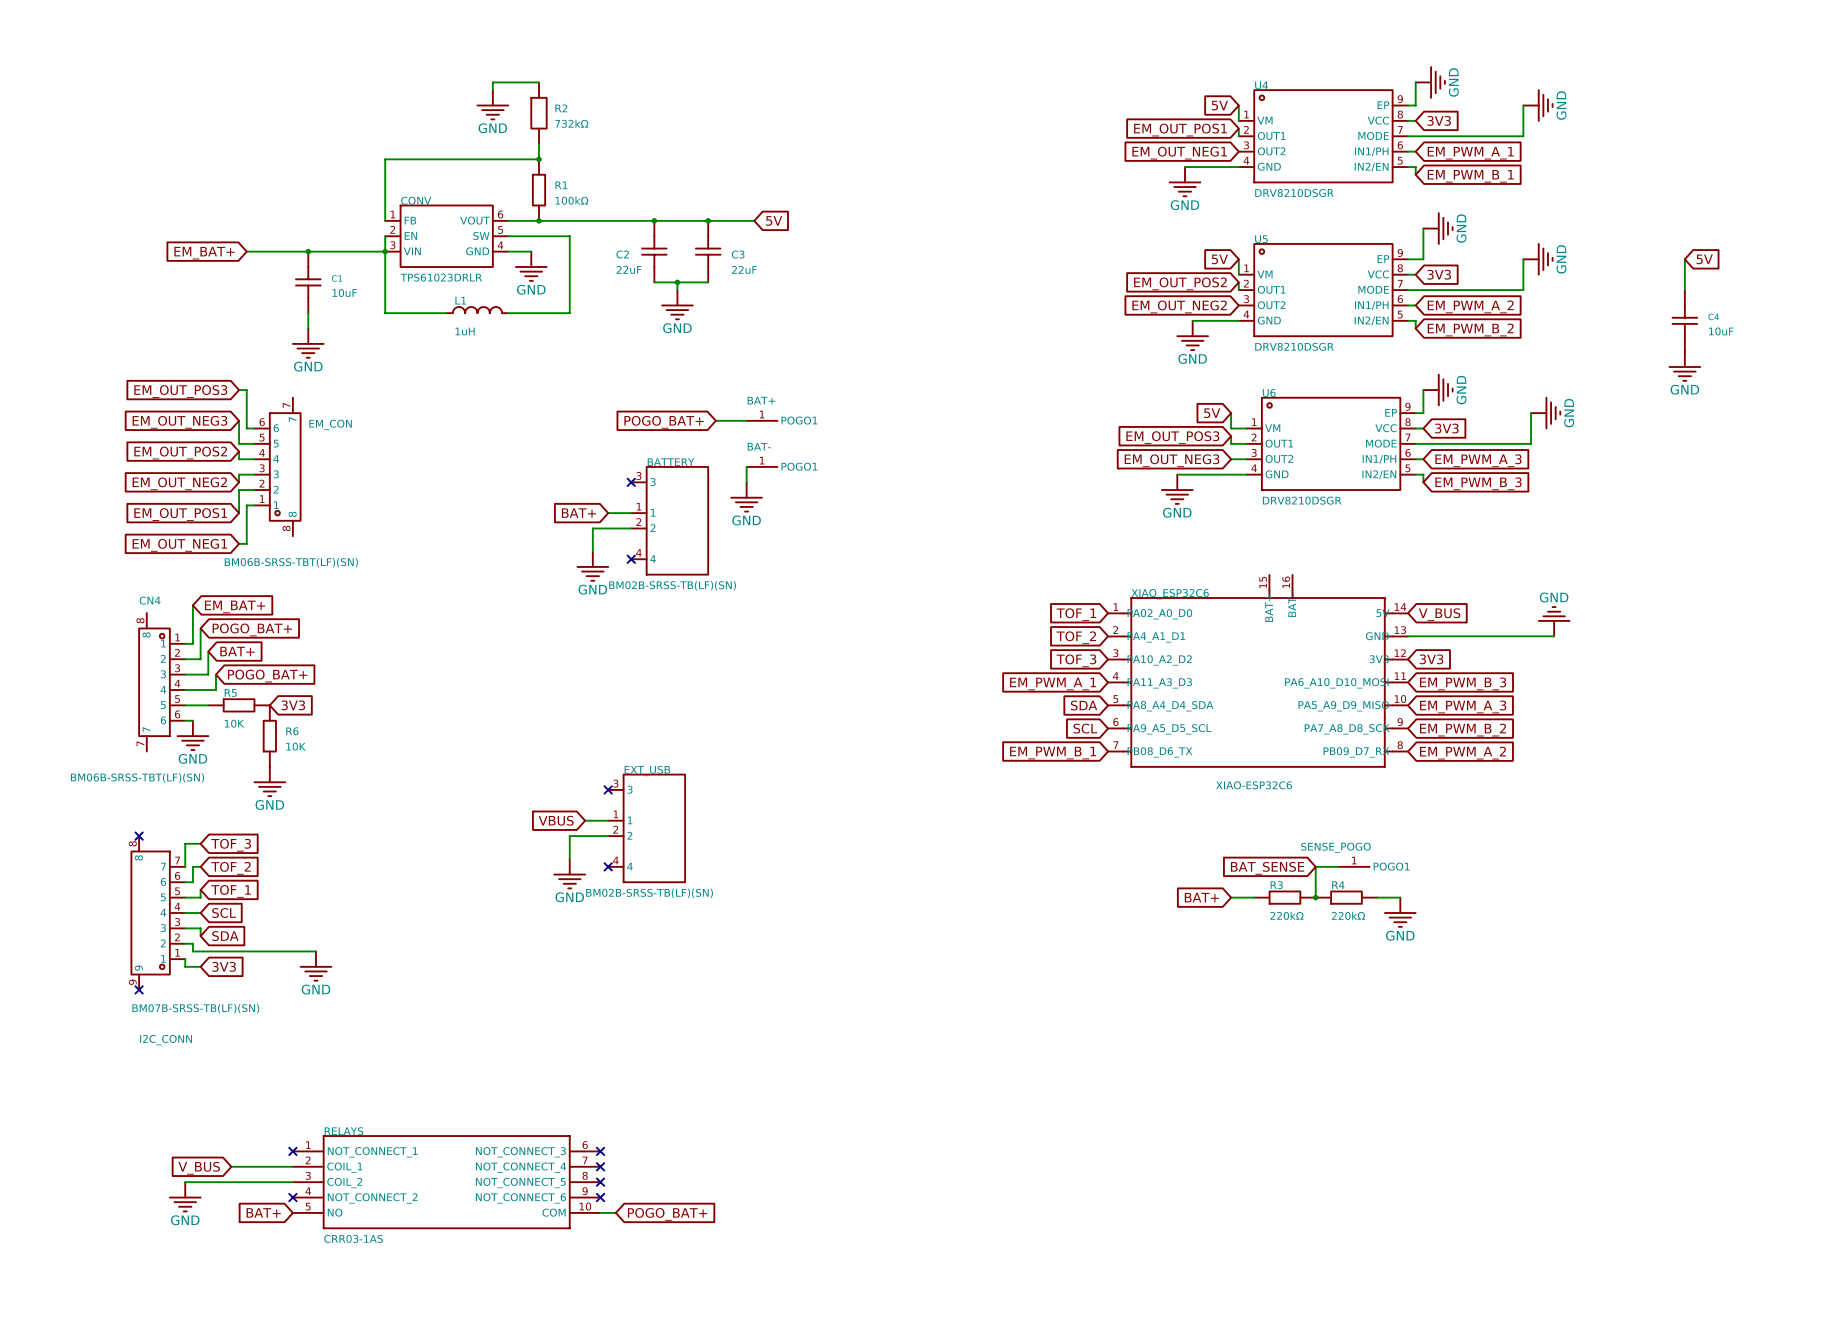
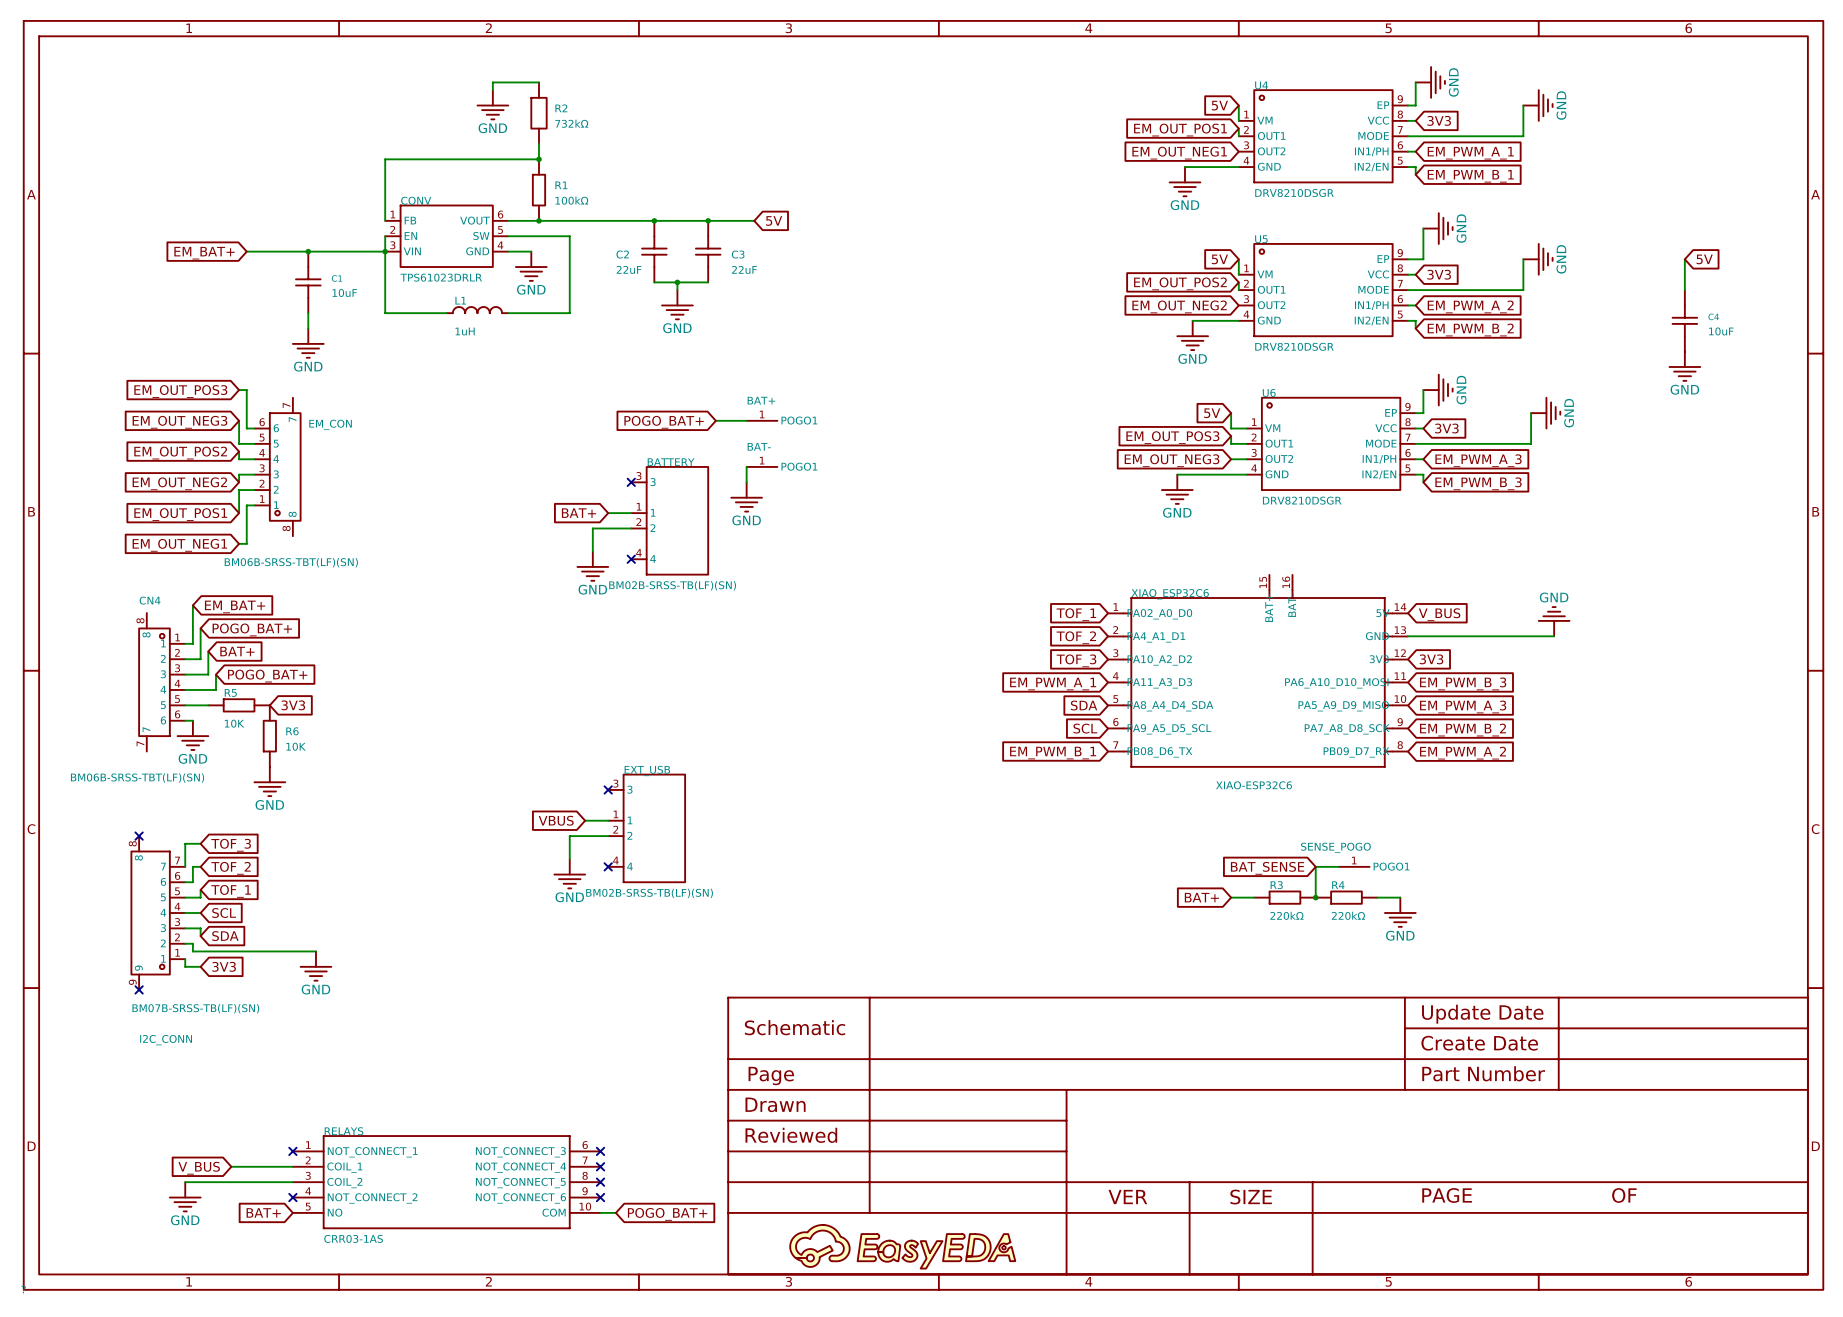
part: none -> (923, 655)

